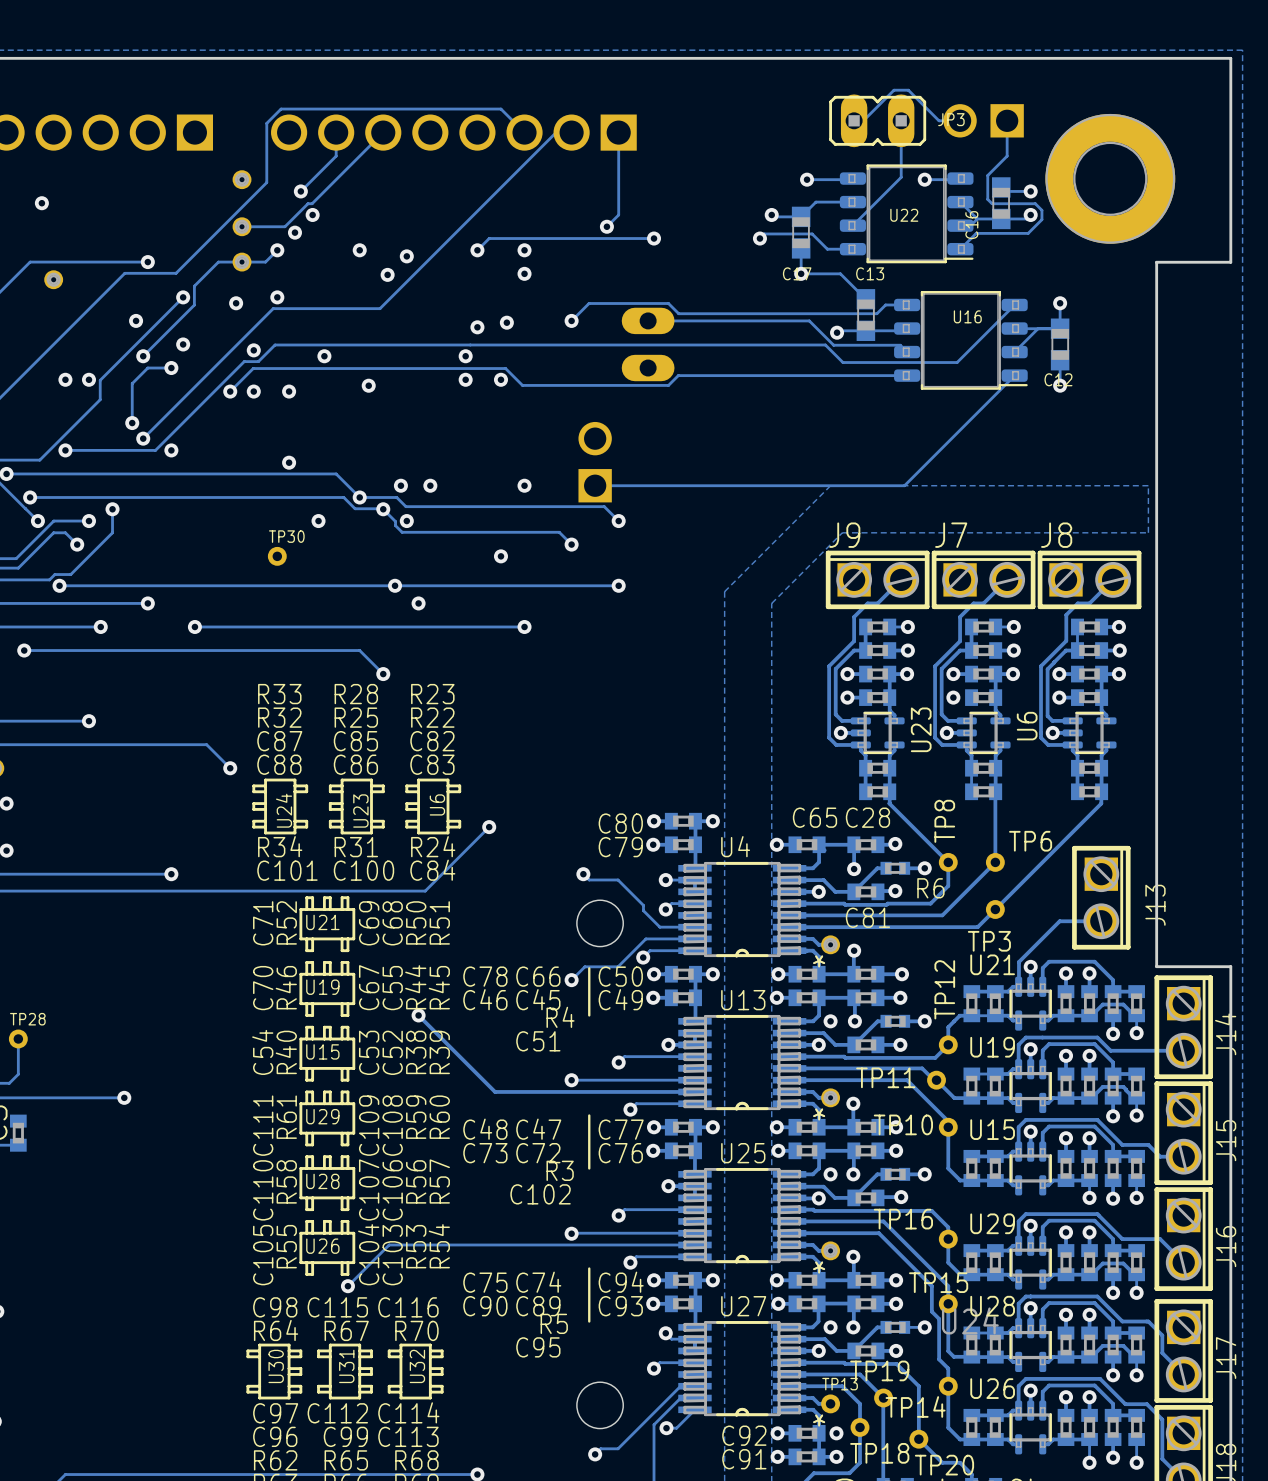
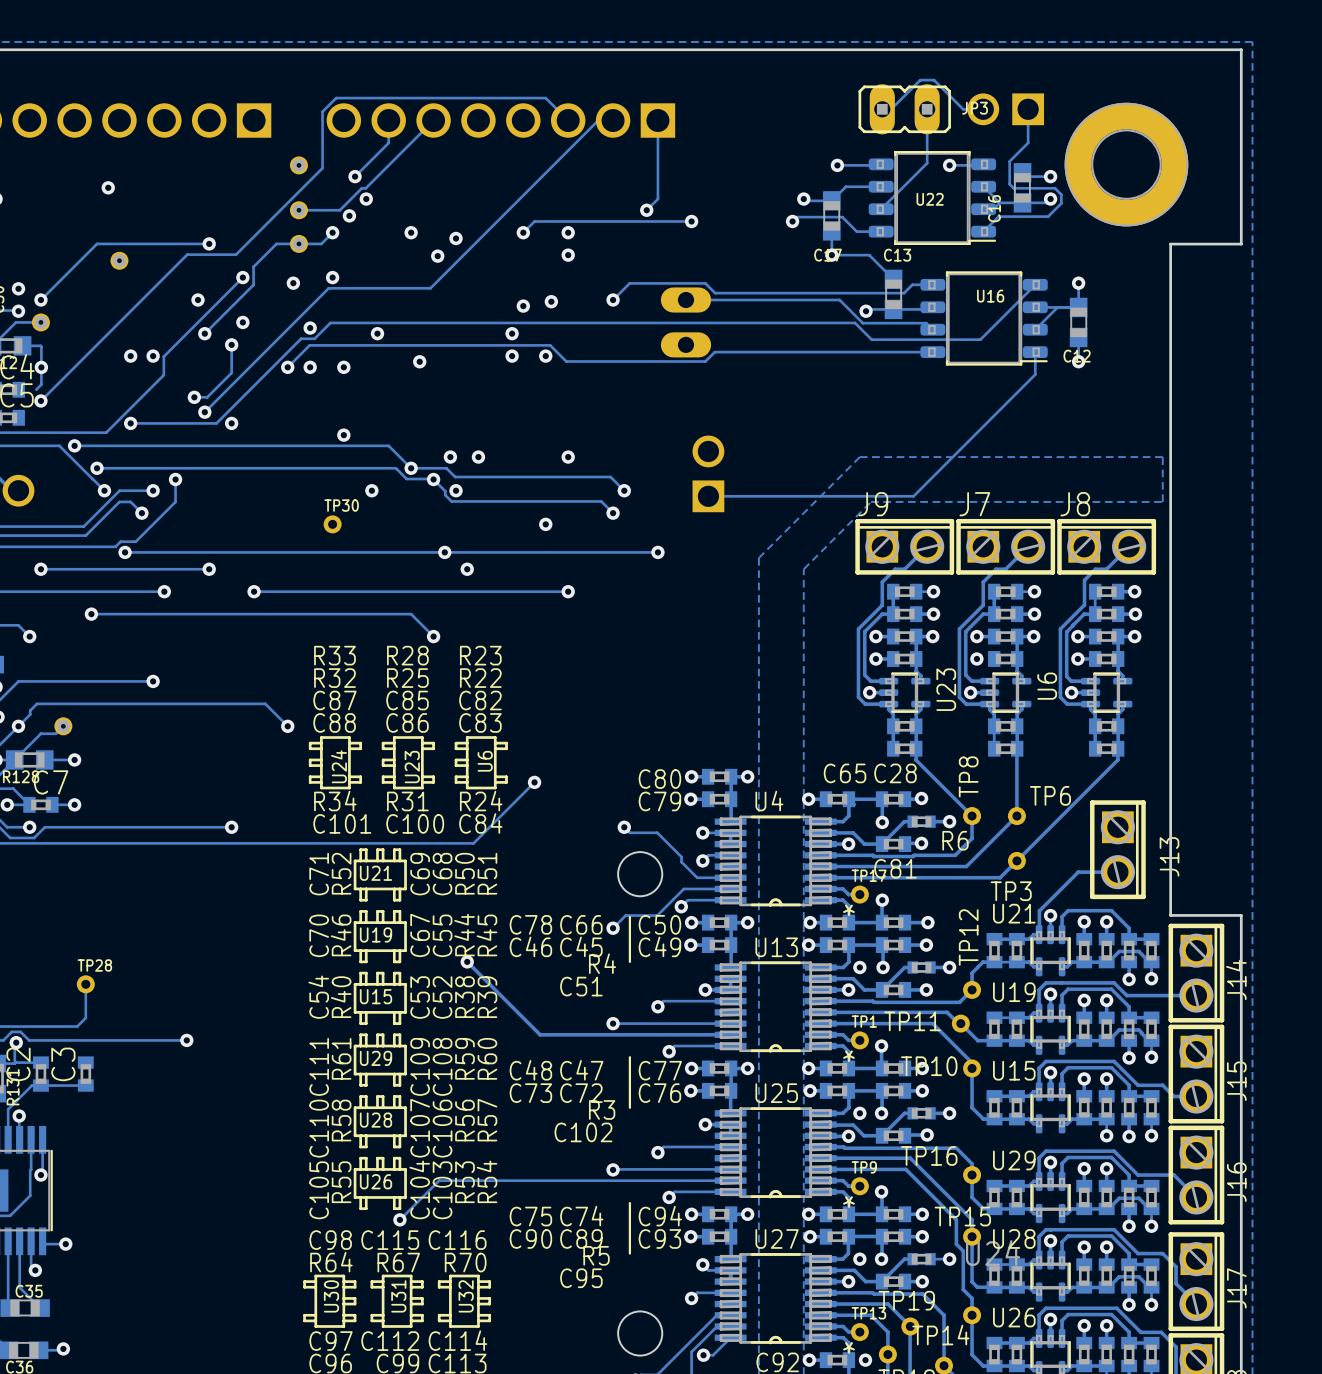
track: (171, 368) (147, 368) (132, 383) (132, 423) -> (231, 344) (231, 372) (207, 397) (194, 397)
track: (1014, 375) (904, 485) (595, 485) -> (1035, 352) (1035, 374) (913, 496) (708, 496)
part position: (595, 462) -> (708, 473)
track: (568, 506) (604, 506) (618, 521) -> (610, 477) (624, 490)
via position: (618, 521) -> (624, 490)
TP17 side: top (830, 944) -> bottom (859, 894)
TP1 side: top (830, 1097) -> bottom (859, 1040)
TP9 side: top (830, 1250) -> bottom (859, 1186)

